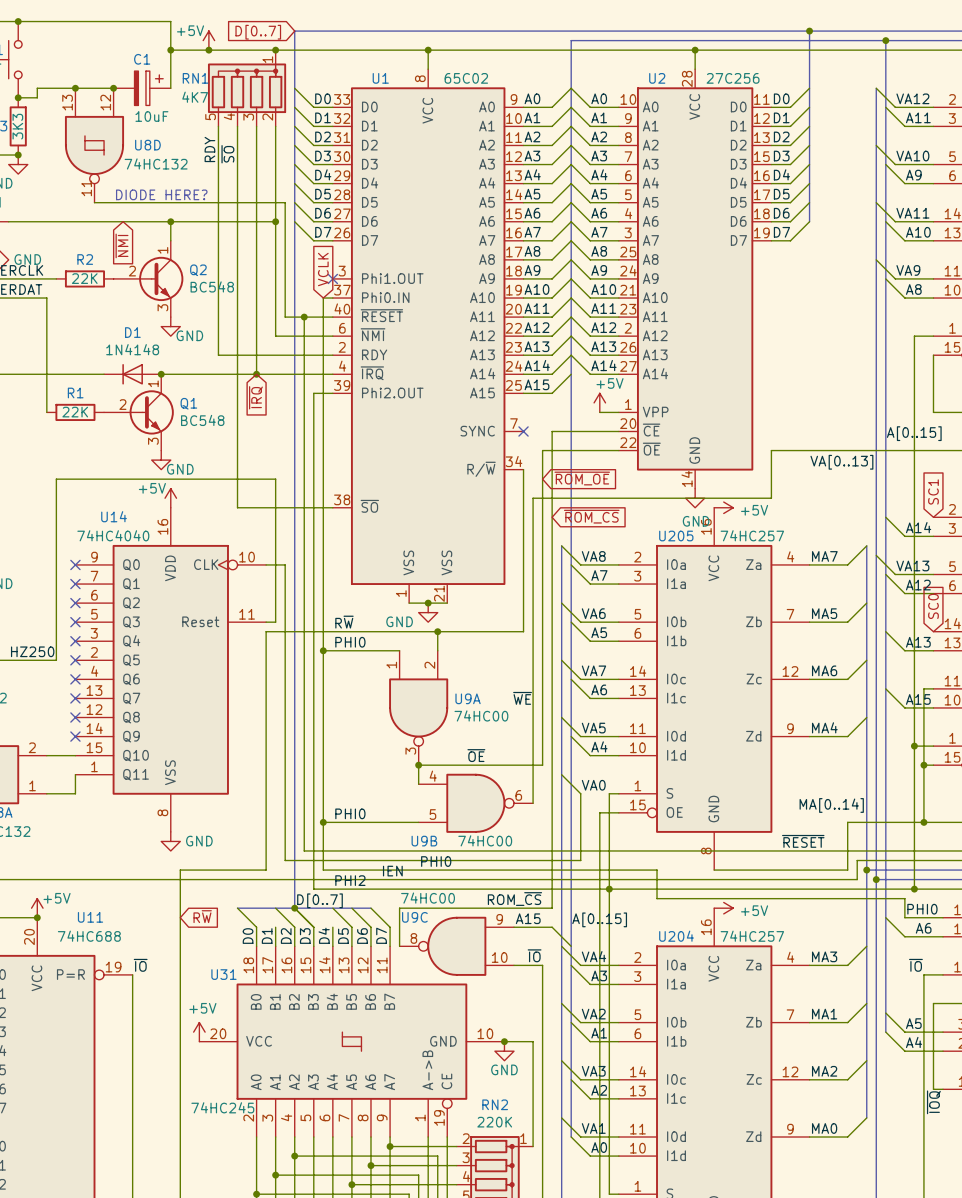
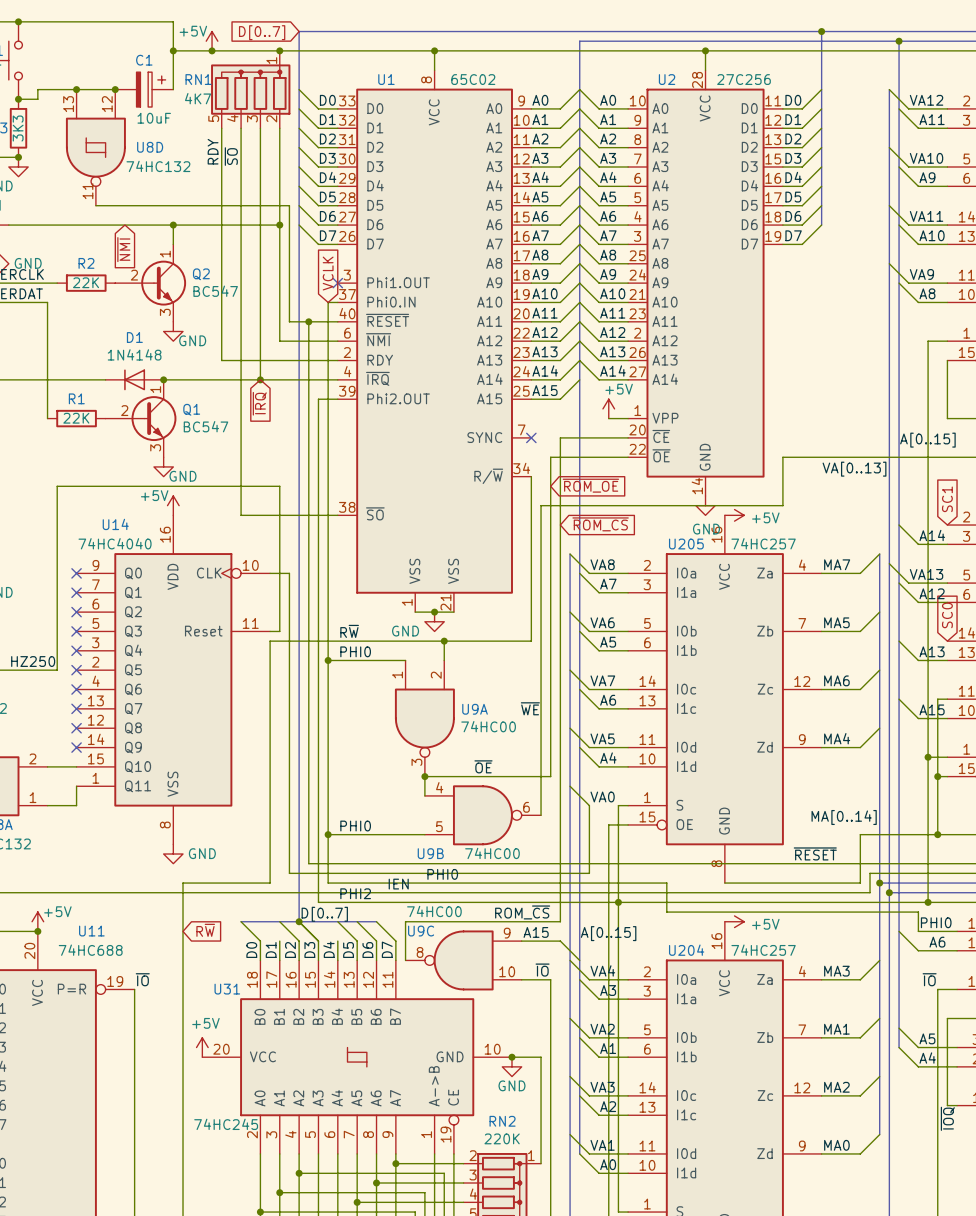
text: DIODE HERE? (161, 194) -> none
Q2 value: BC548 (212, 286) -> BC547 (215, 291)
Q1 value: BC548 (202, 420) -> BC547 (205, 426)

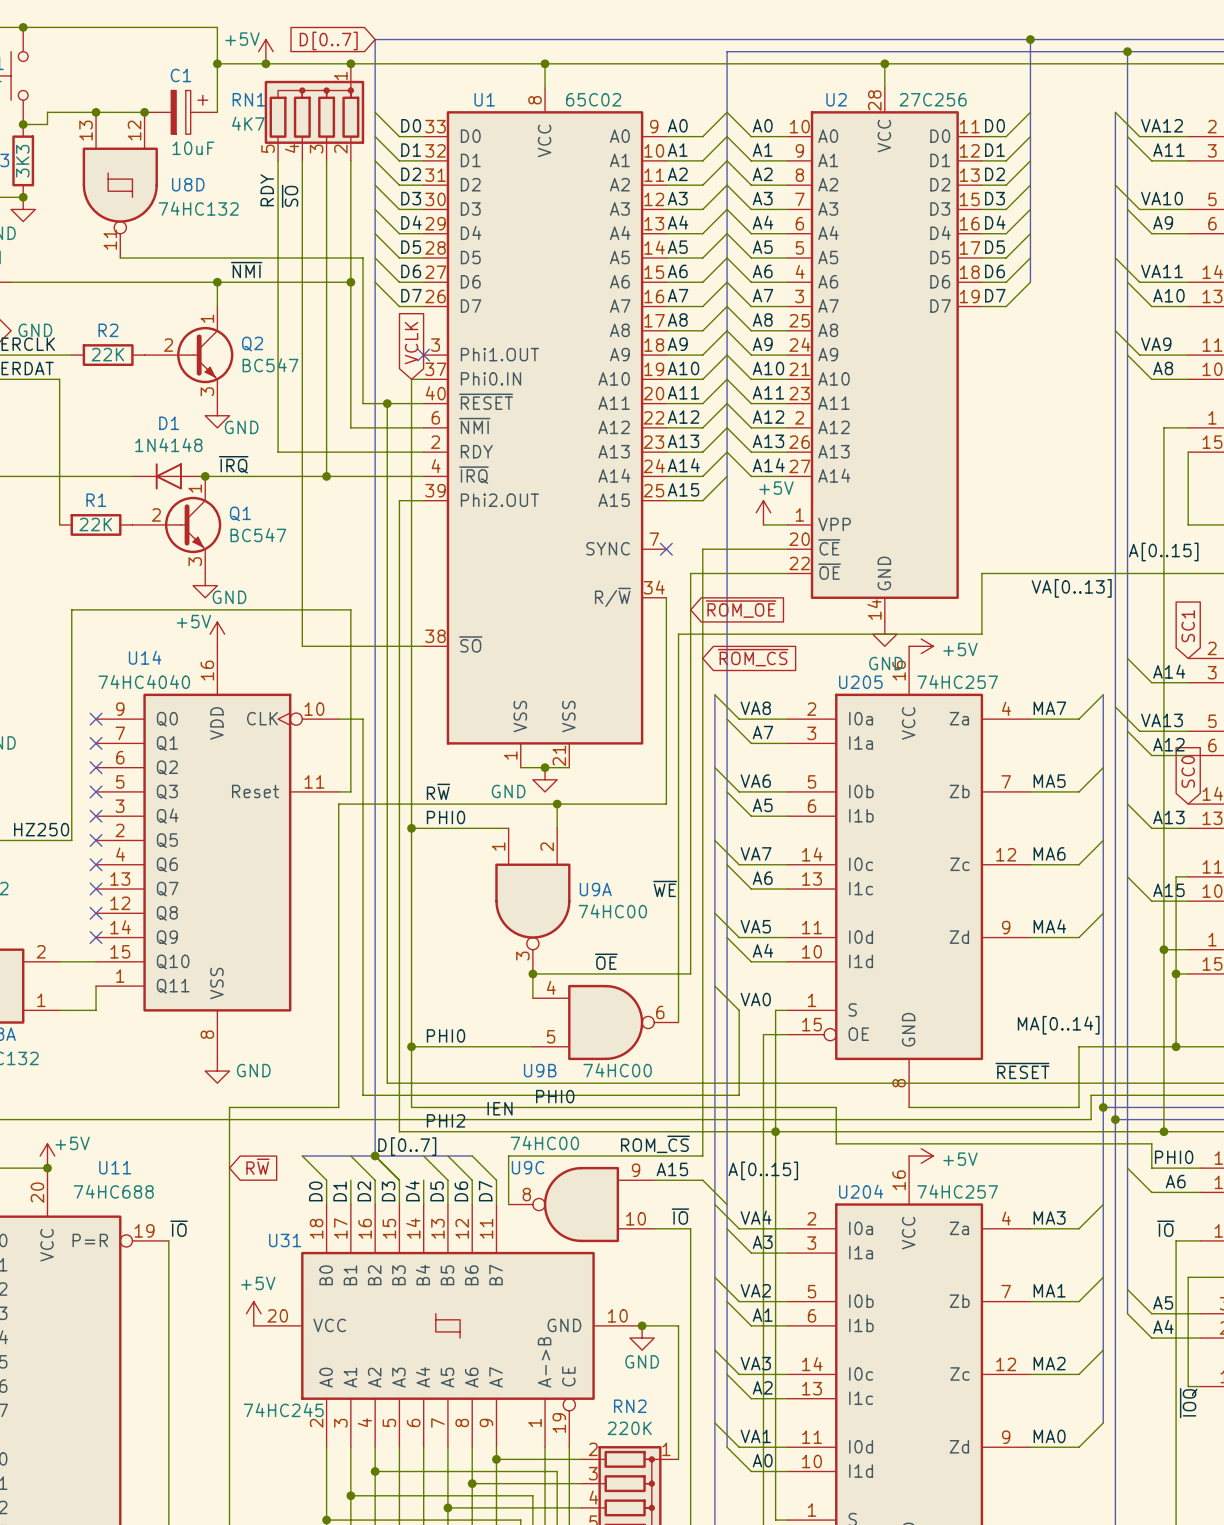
label: none -> ~{NMI} (246, 270)
global label: ~{NMI} (123, 249) -> none
label: none -> ~{IRQ} (233, 464)
global label: ~{IRQ} (259, 403) -> none

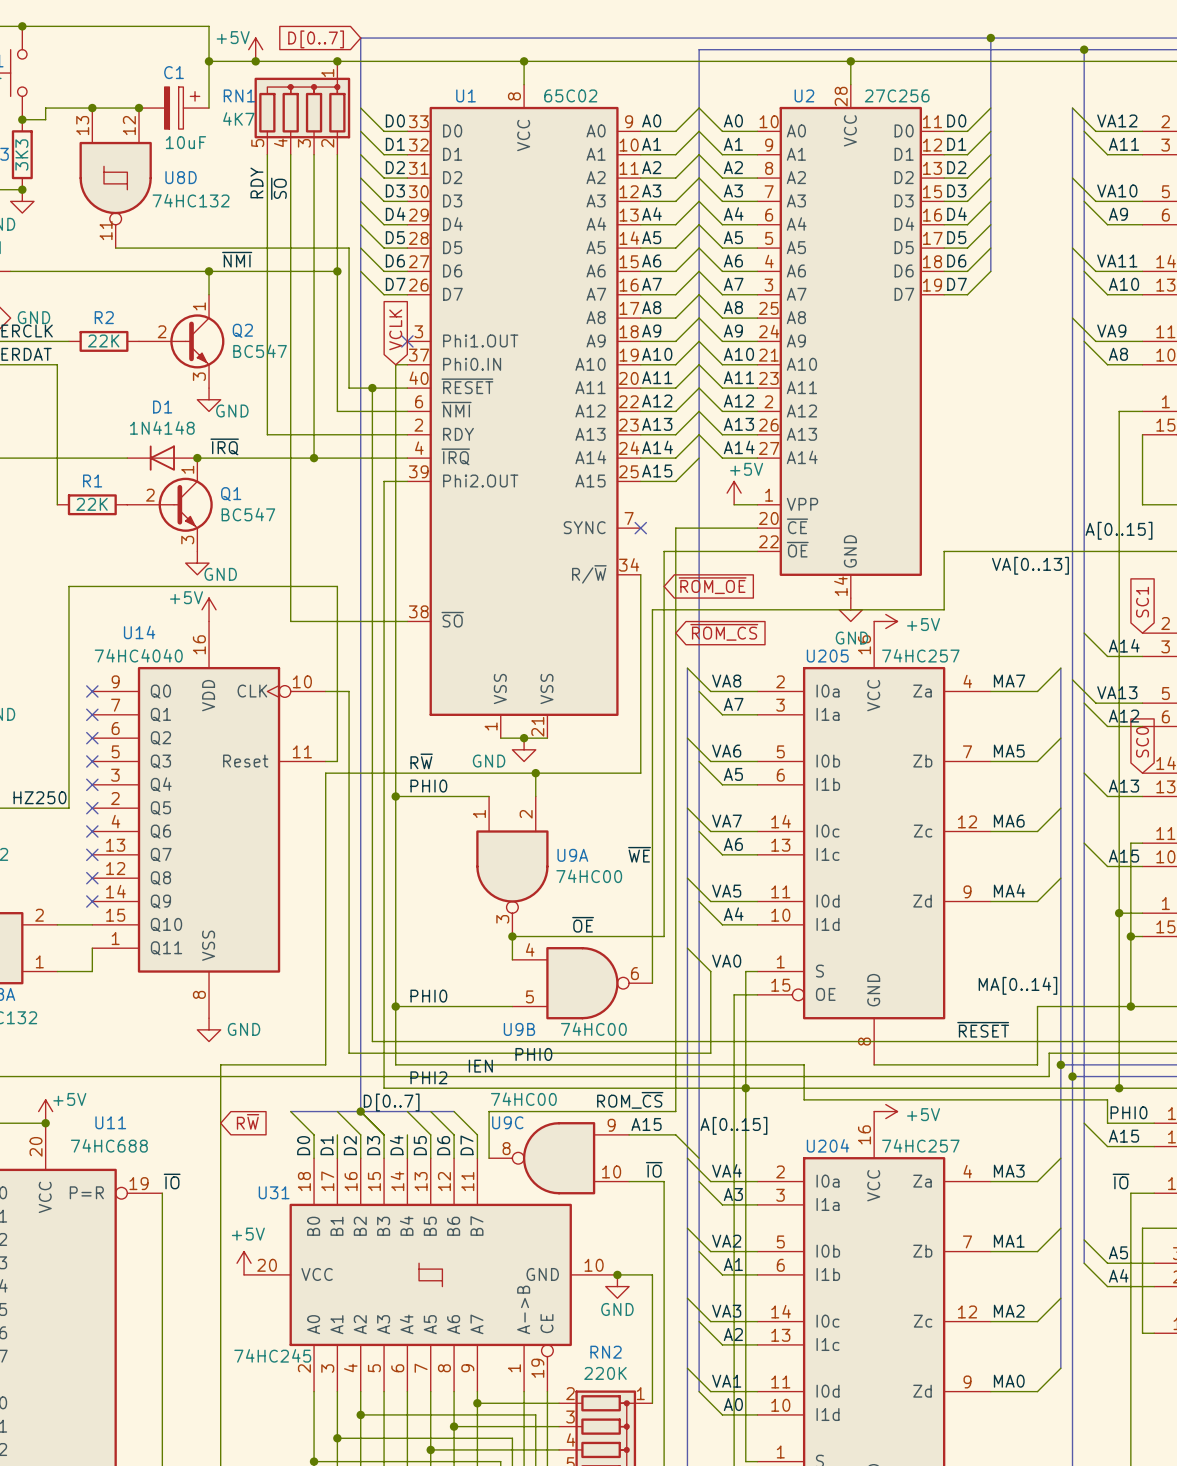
label: none -> A15 (1124, 1136)
label: A6 (1175, 1181) -> none
label: ~{IOQ} (1188, 1403) -> none

